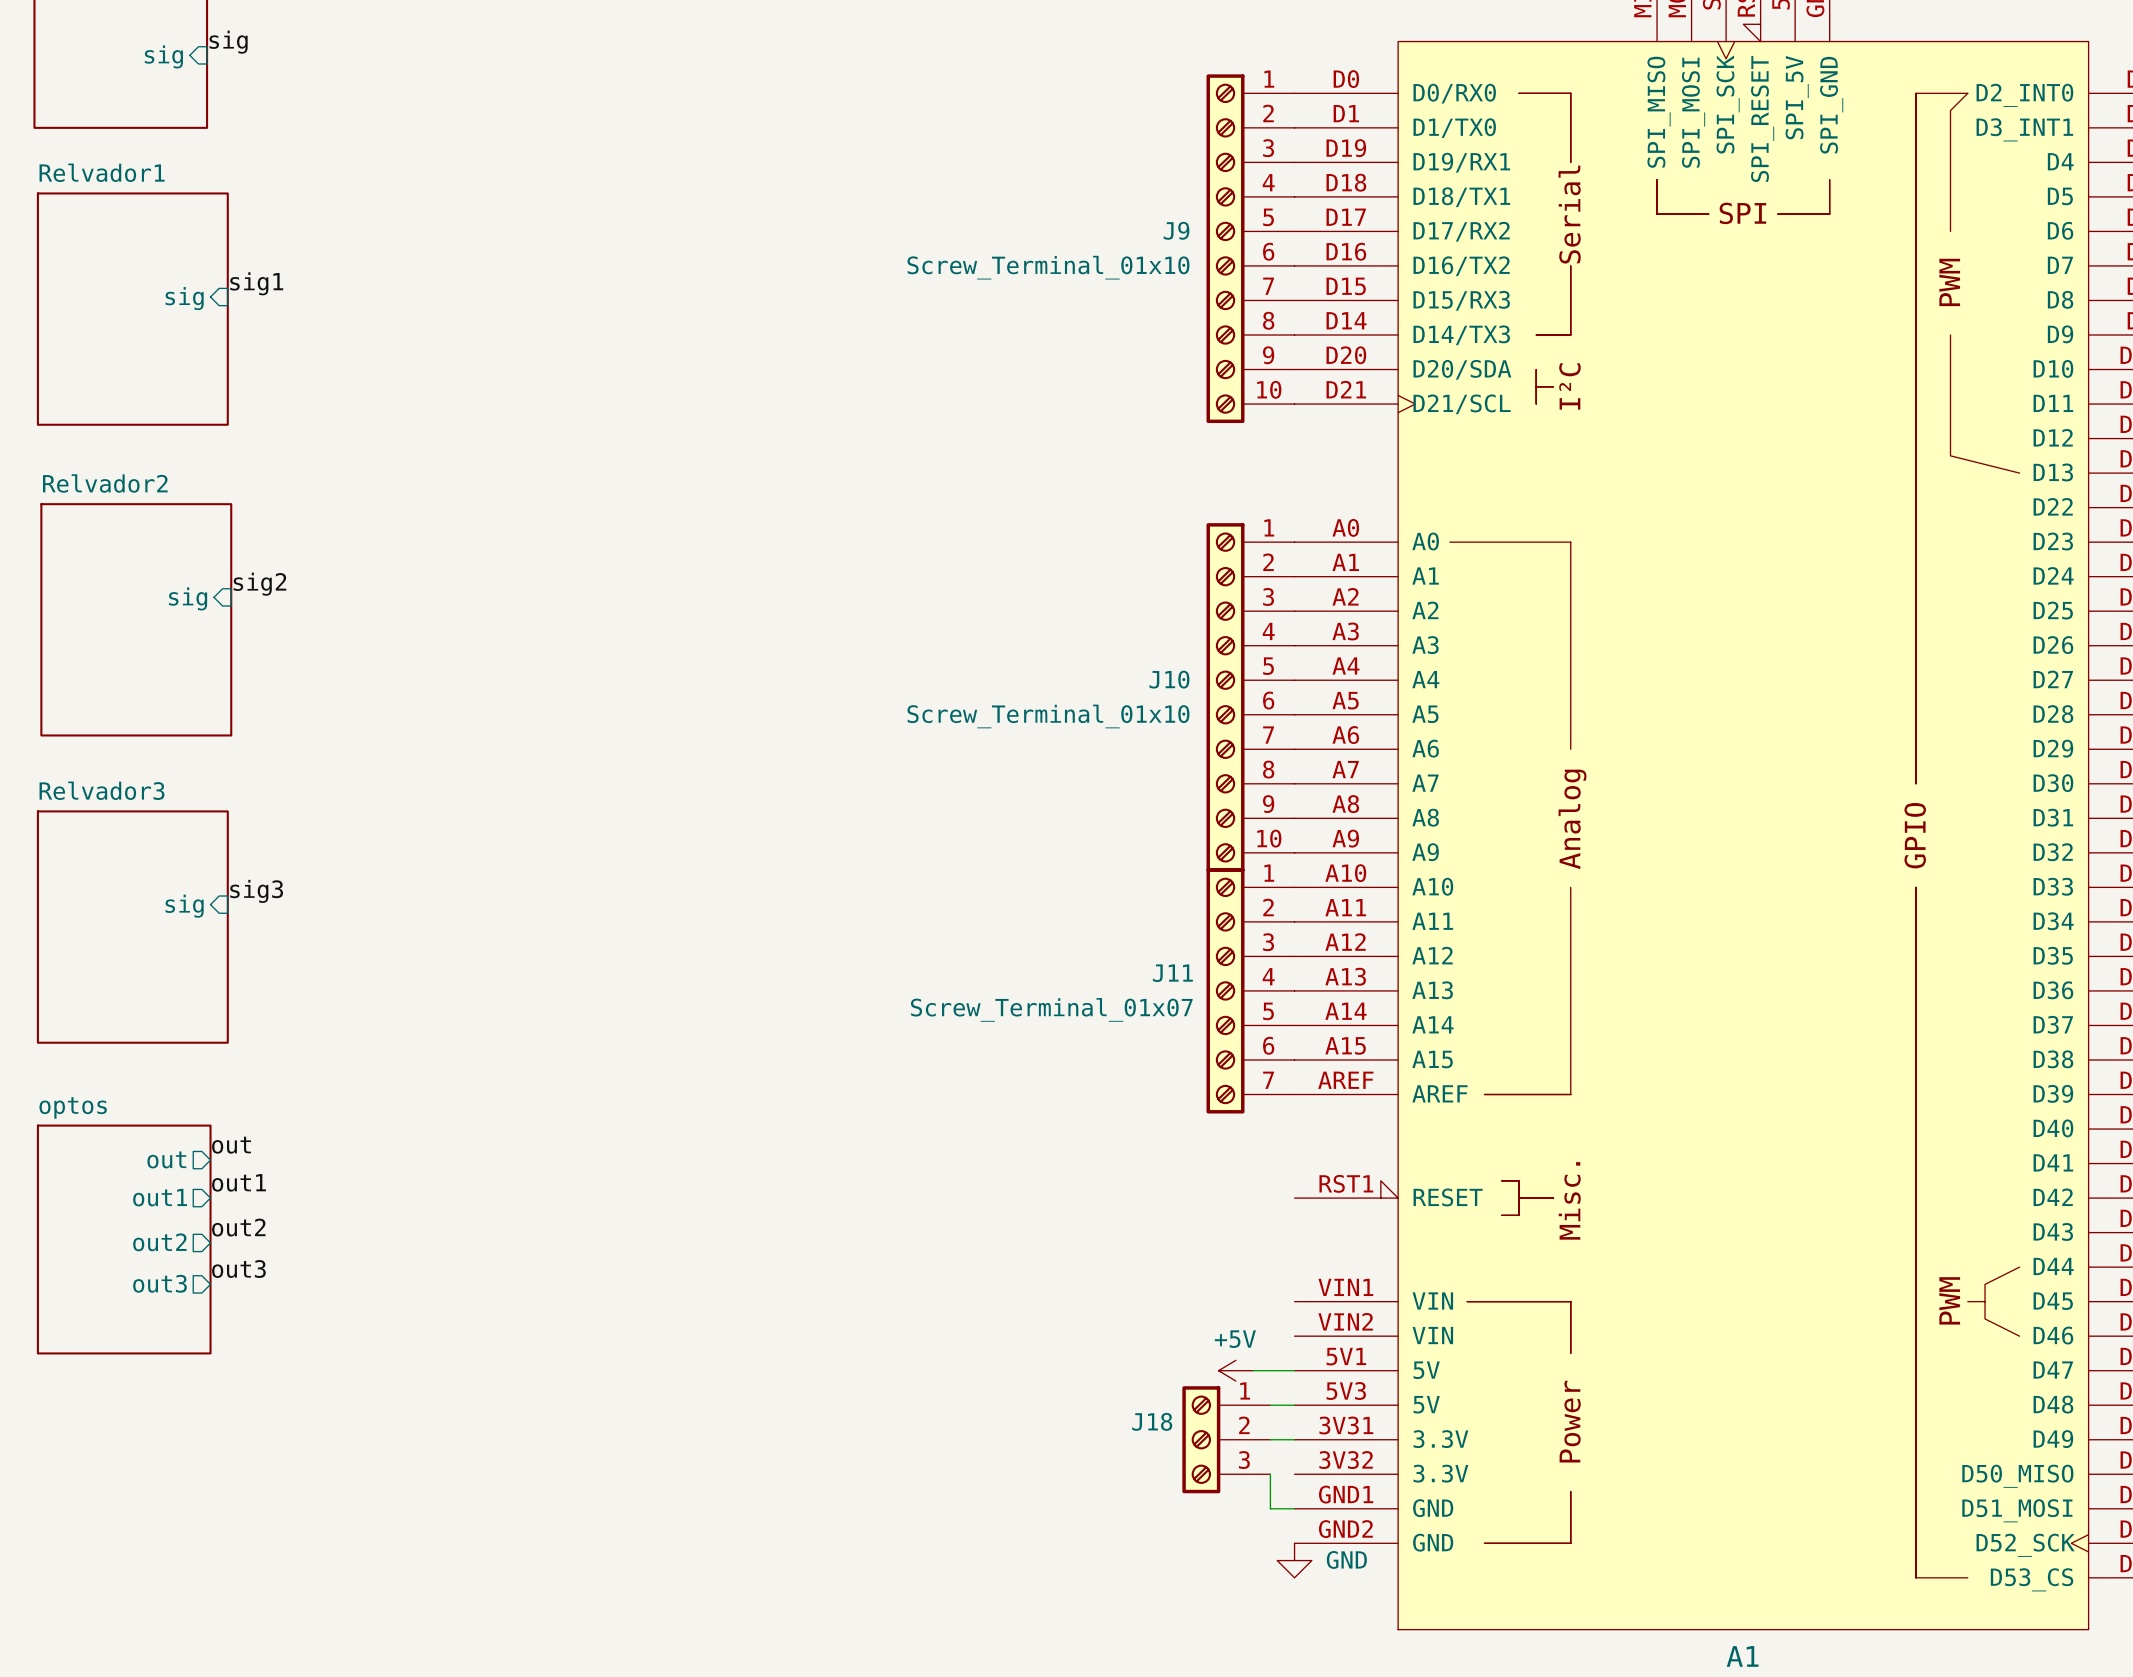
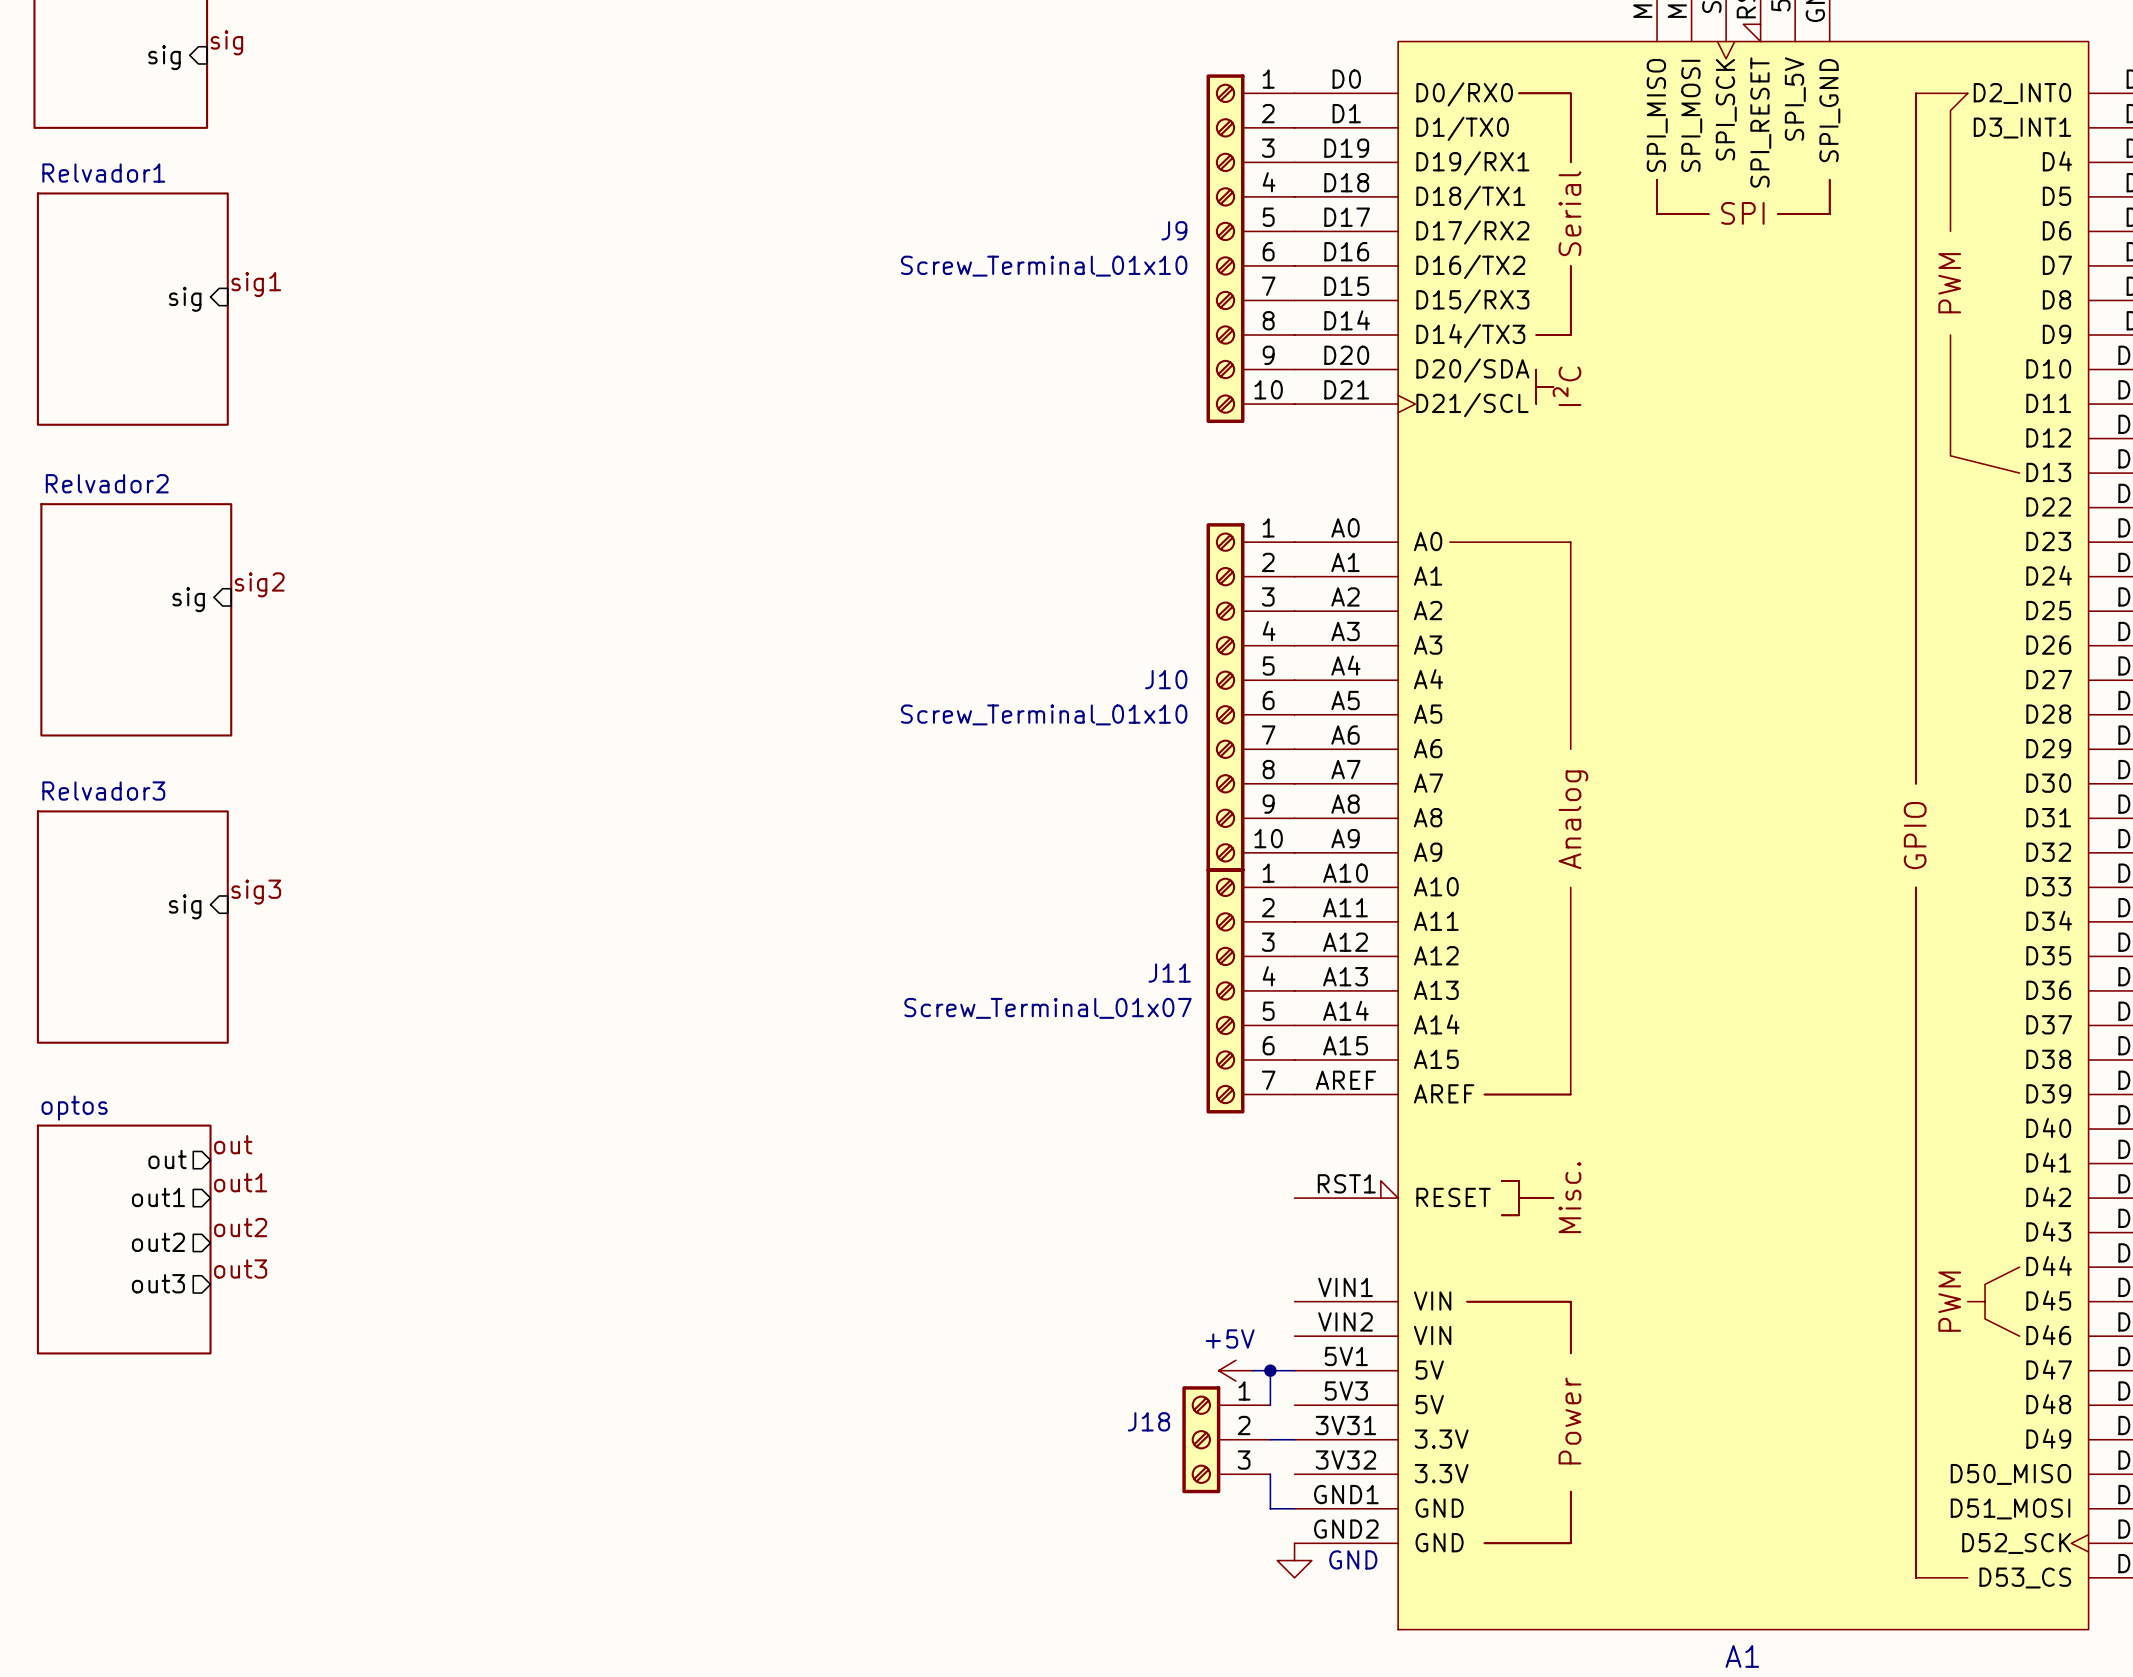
junction: none -> (1270, 1370)
wire: (1270, 1405) (1294, 1405) -> (1270, 1405) (1270, 1370)

